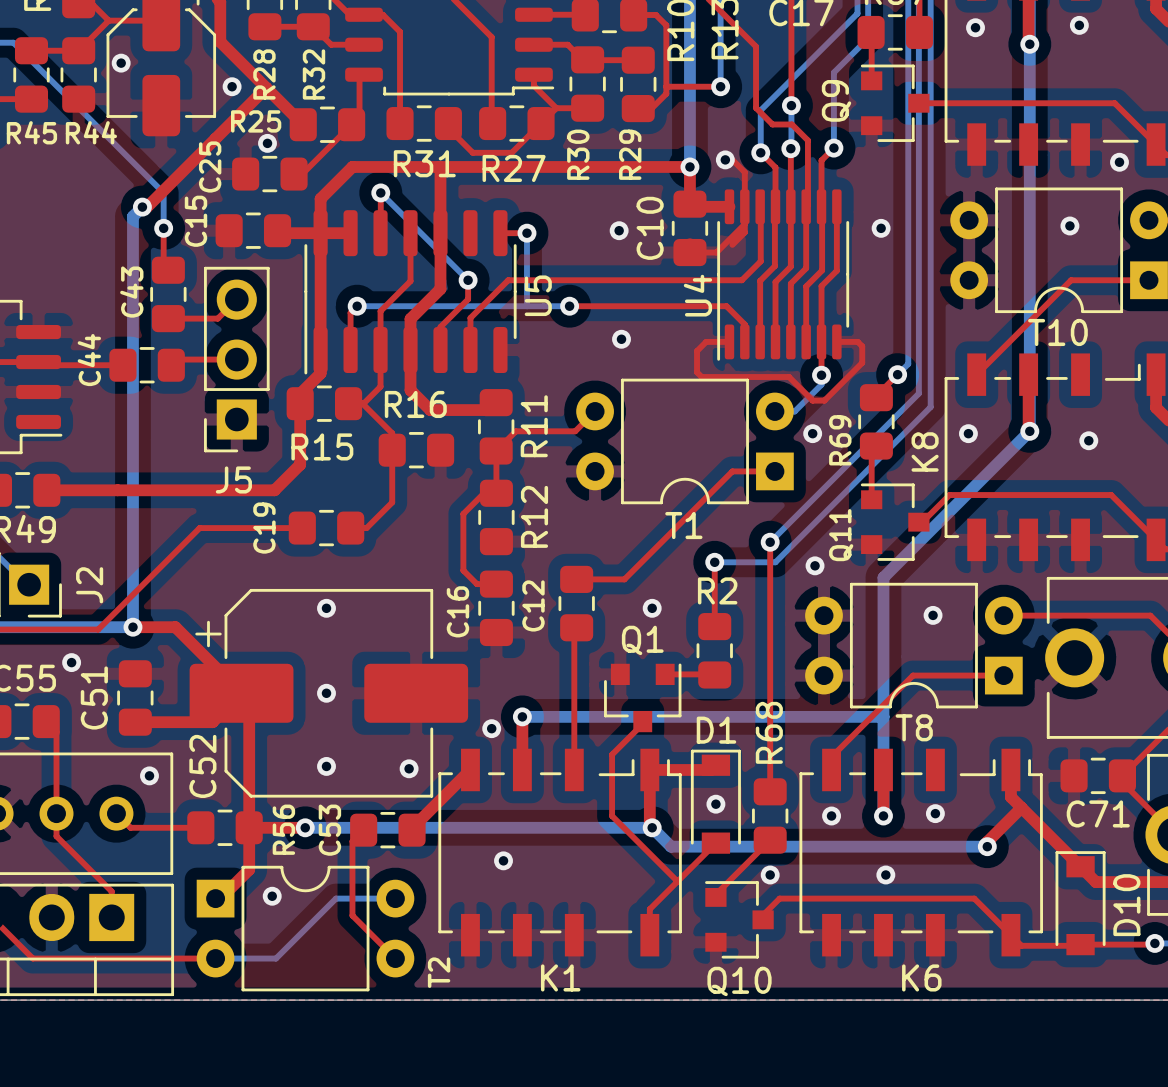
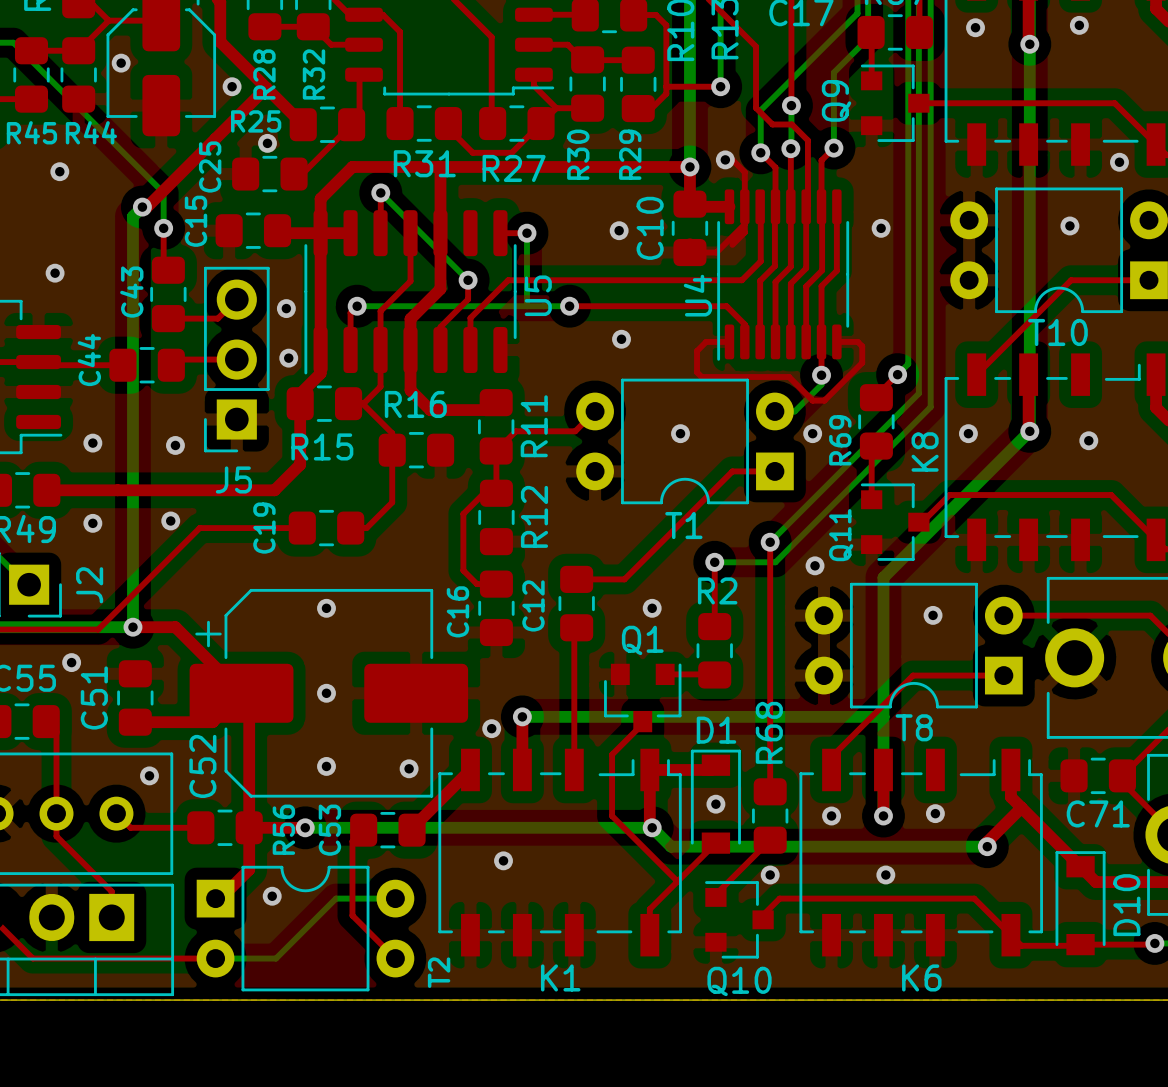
via: none -> (59, 171)
via: none -> (55, 273)
via: none -> (286, 308)
via: none -> (288, 358)
via: none -> (680, 433)
via: none -> (92, 443)
via: none -> (175, 445)
via: none -> (170, 520)
via: none -> (92, 523)

